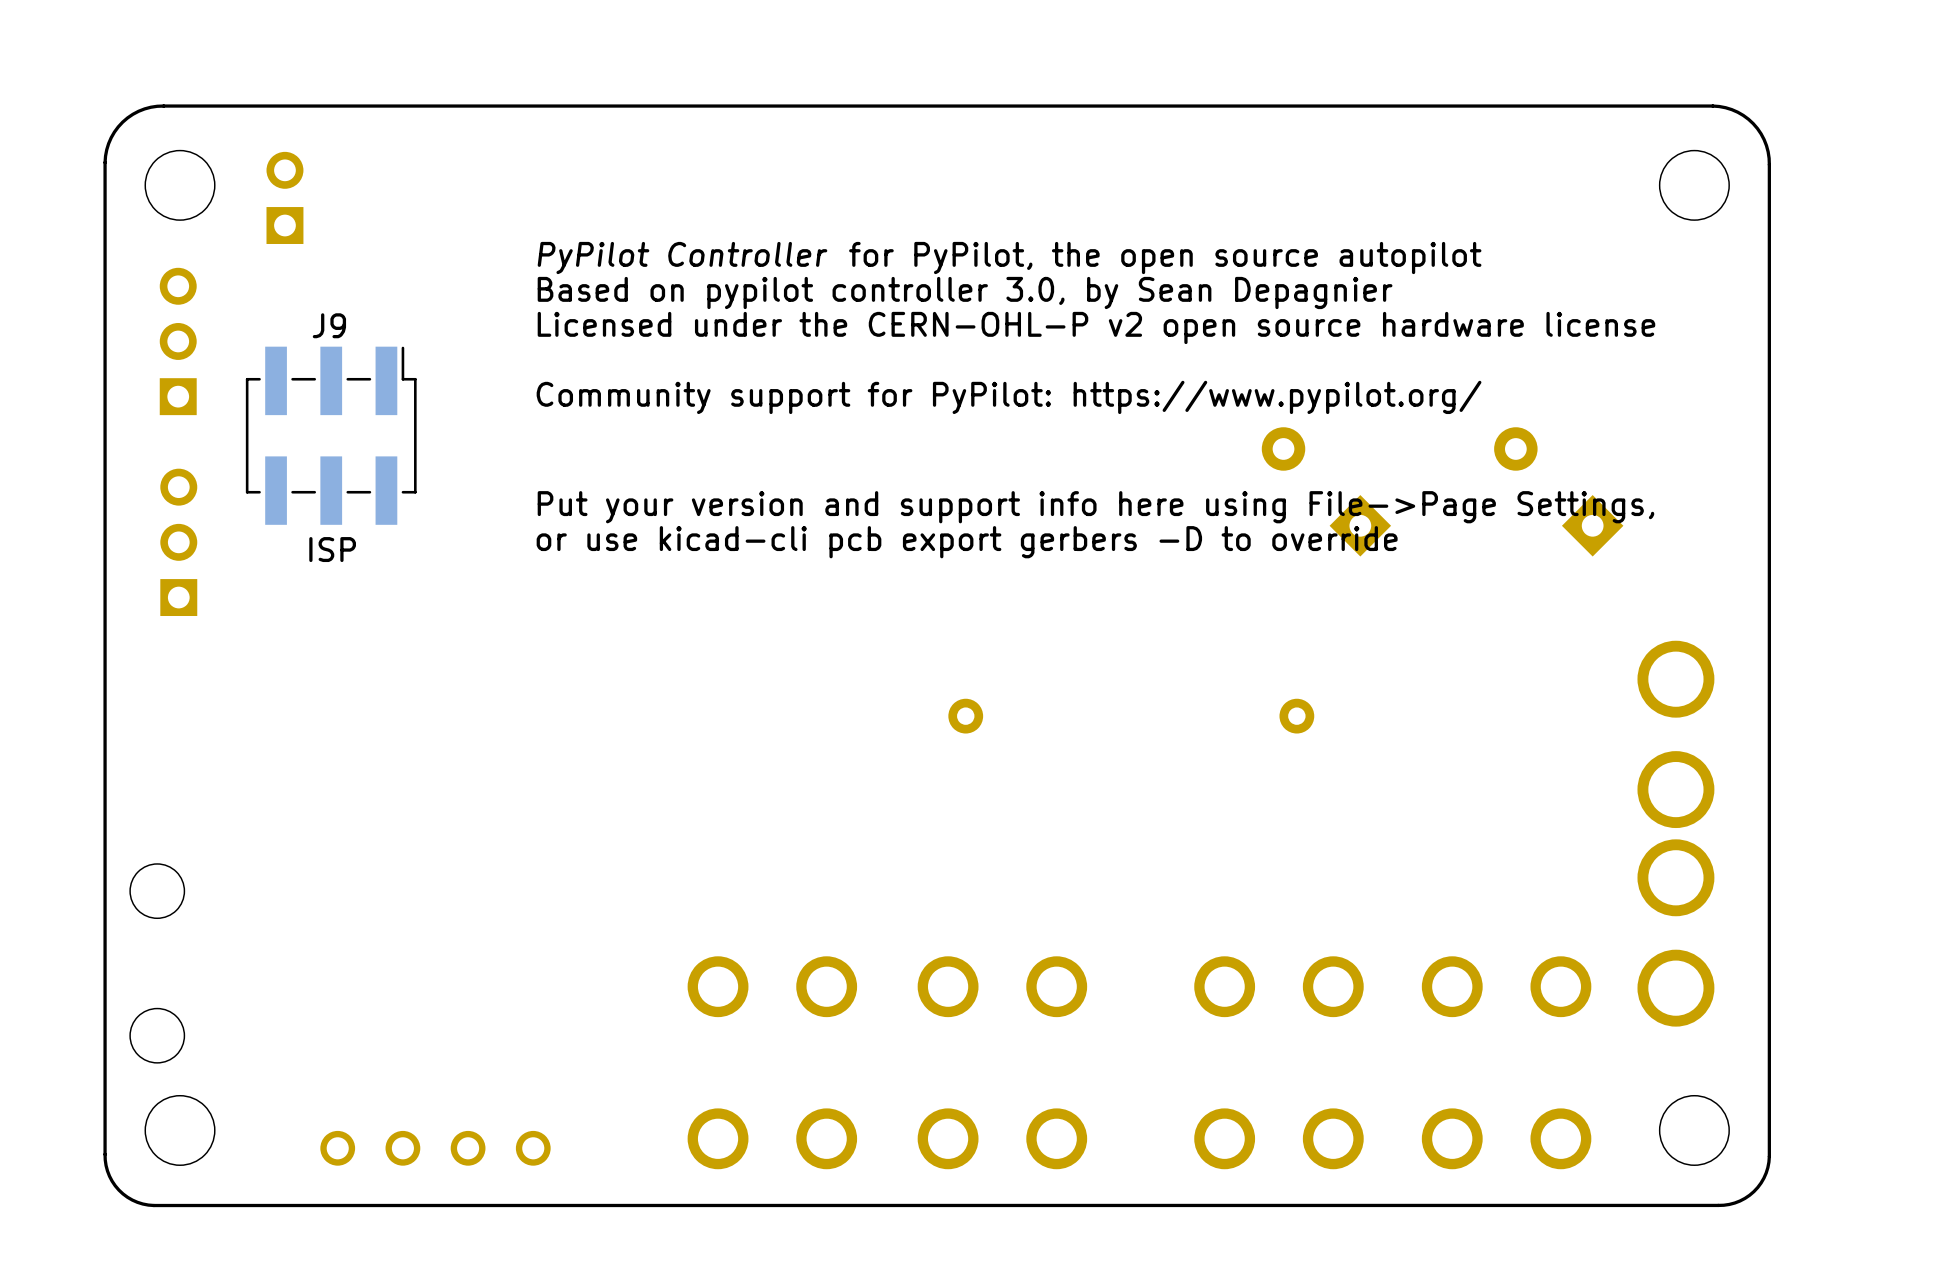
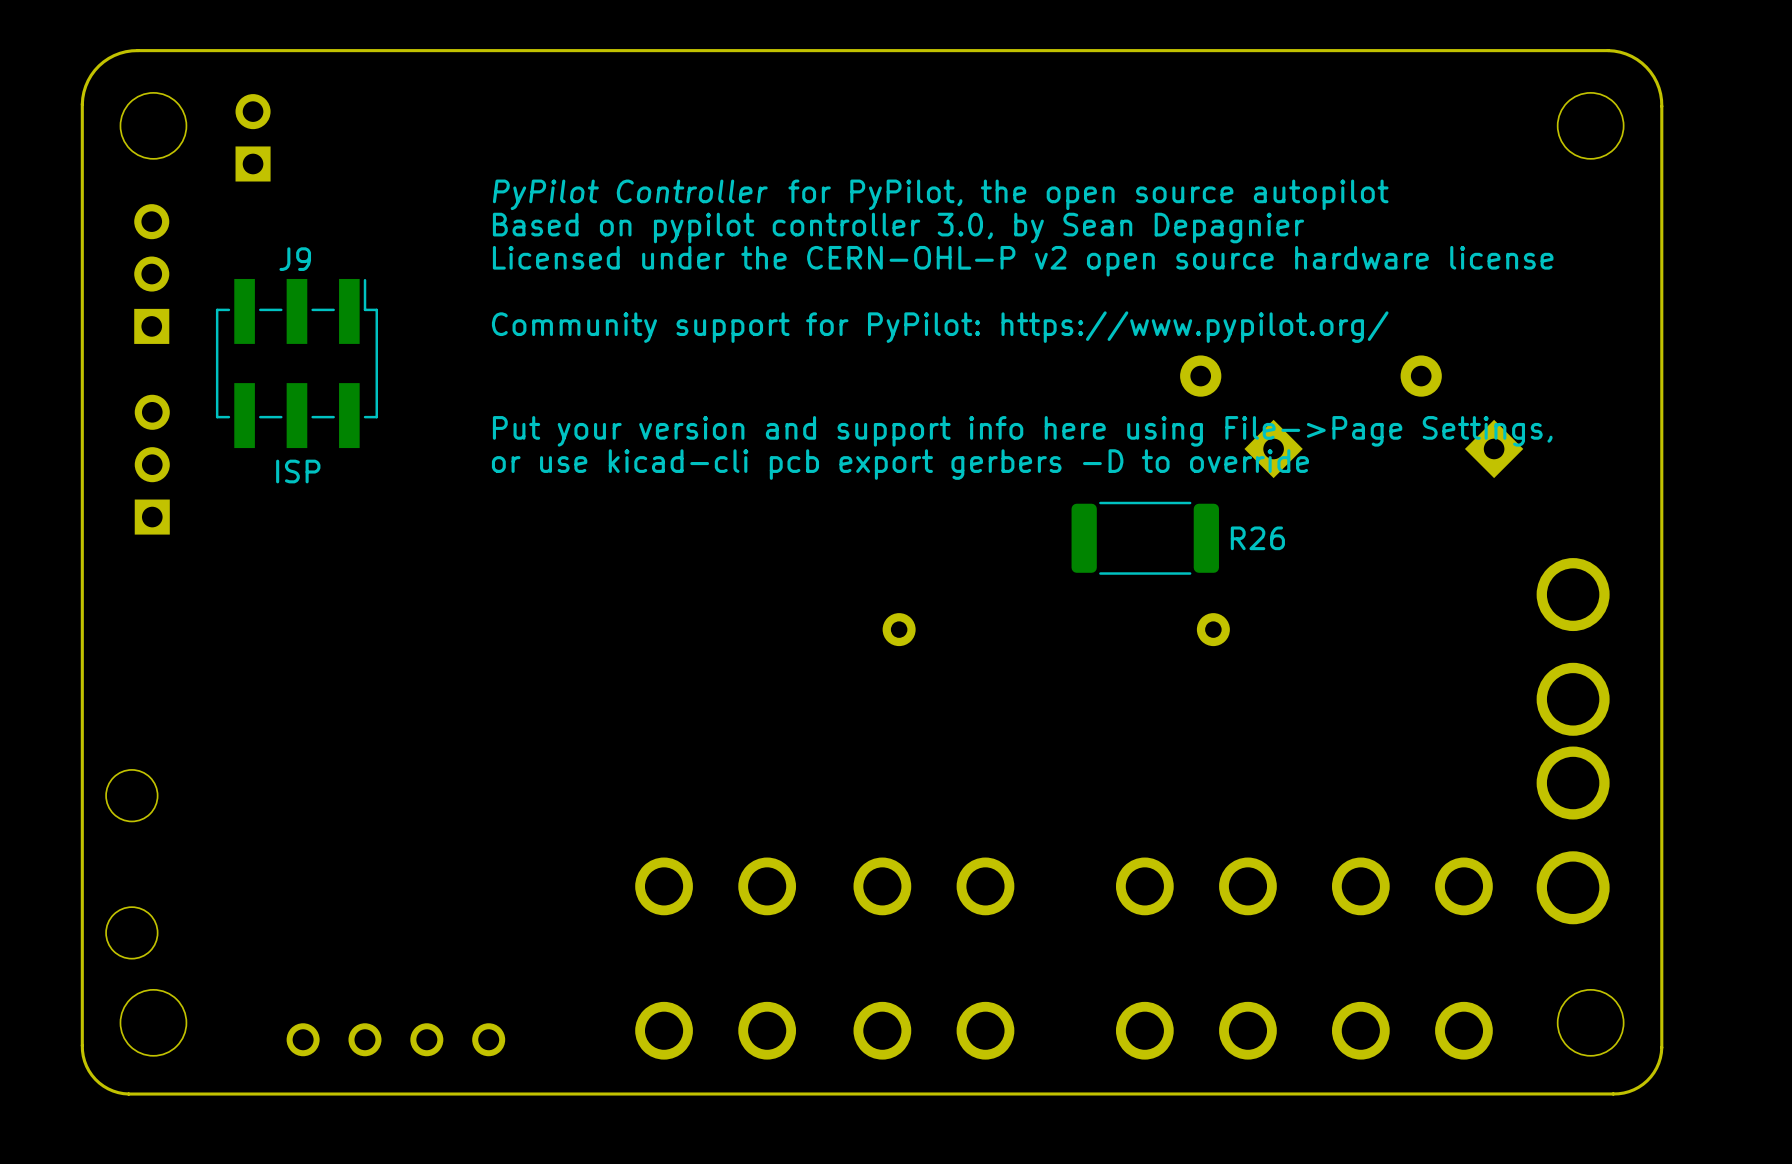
R26: none -> (1145, 538)

